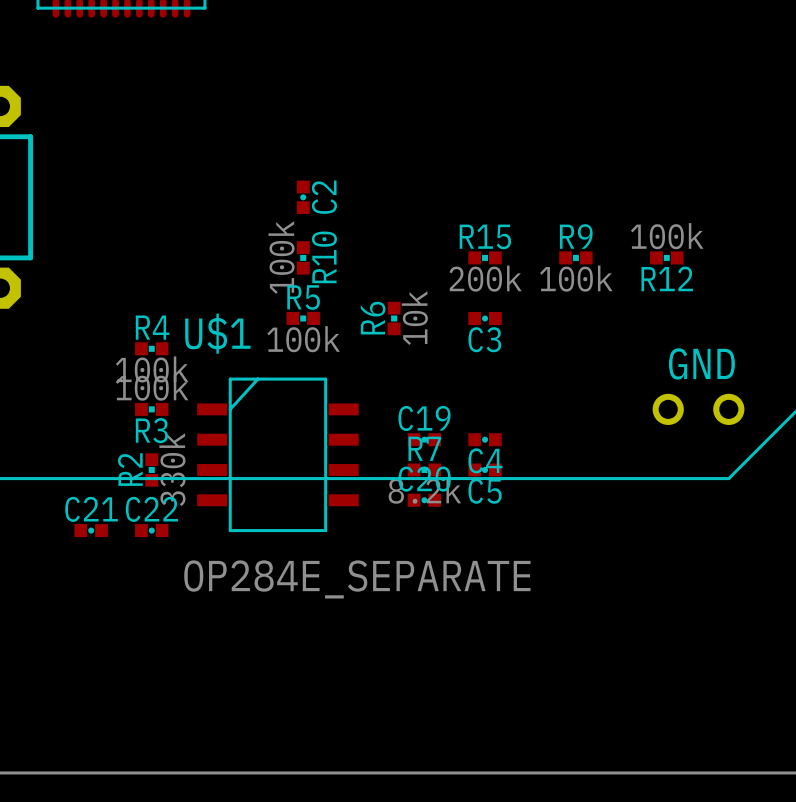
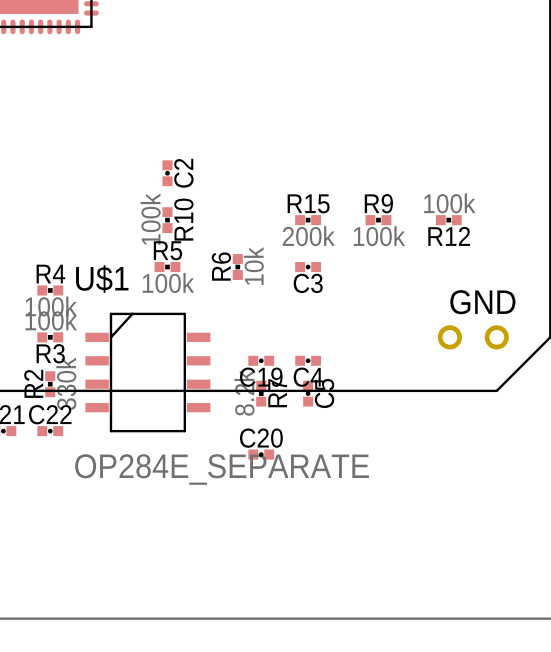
C19 name position: C19 (424, 418) -> C19 (261, 377)
R7 rotation: 0° (424, 469) -> 90° clockwise (261, 393)
C5 rotation: 0° (485, 469) -> 90° clockwise (308, 393)
C20 position: (424, 500) -> (261, 454)

